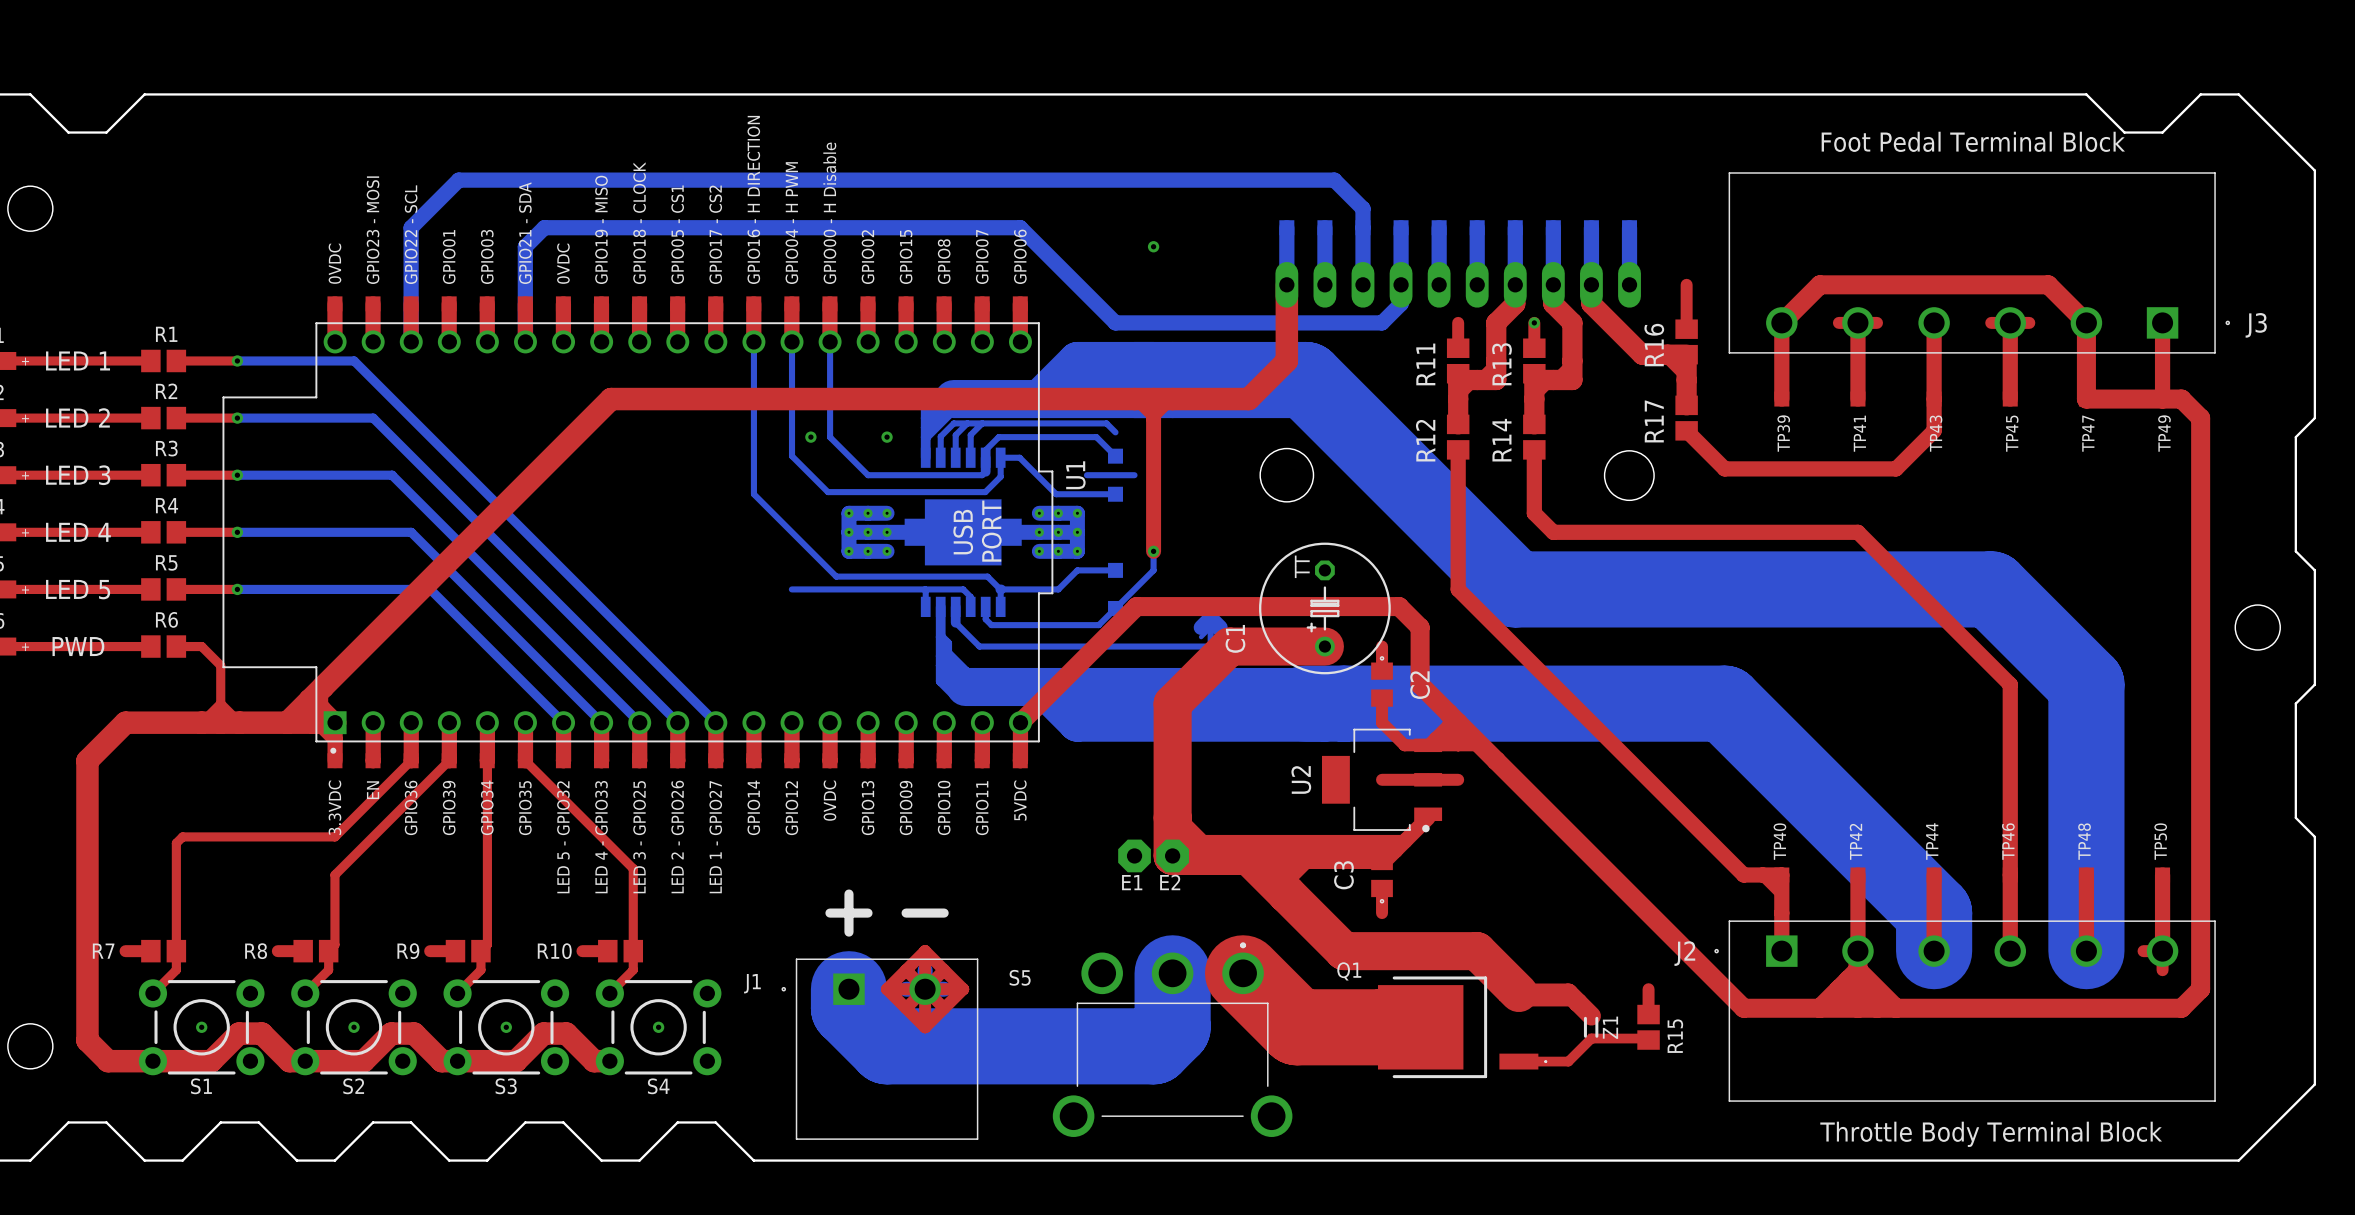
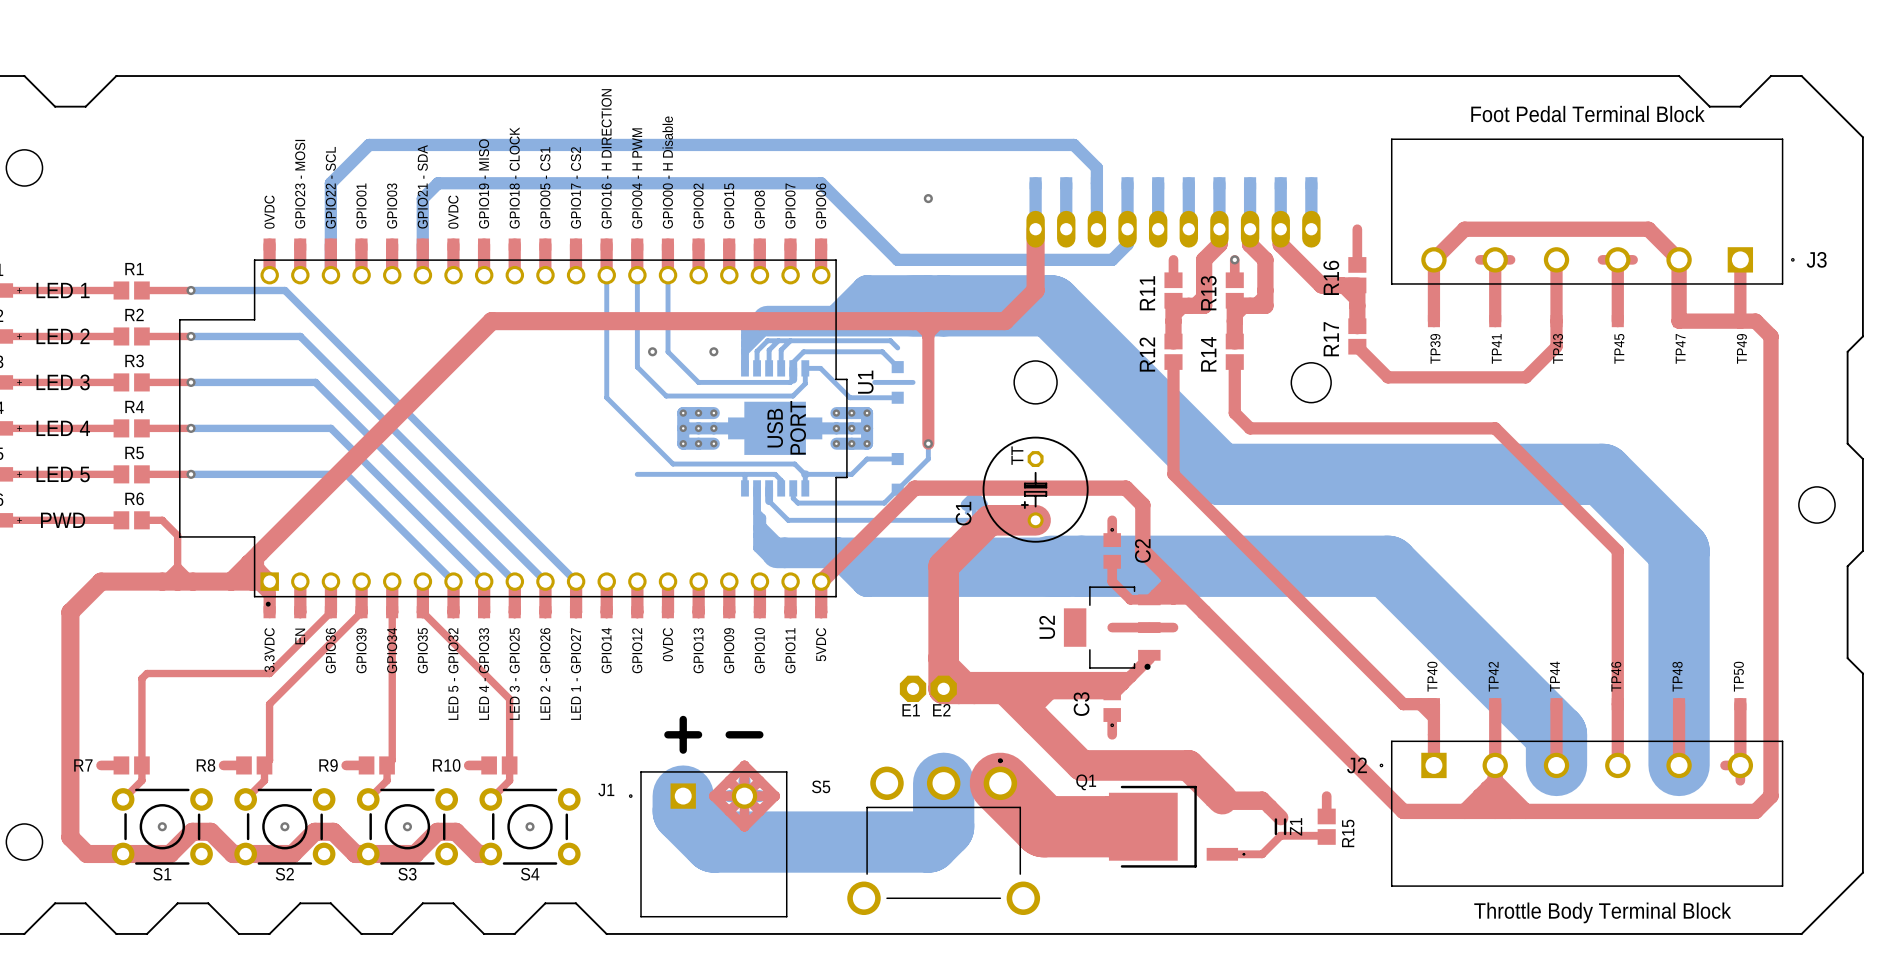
C1 position: (1324, 608) -> (1035, 489)
top track: (1286, 646) (1324, 646) -> none

